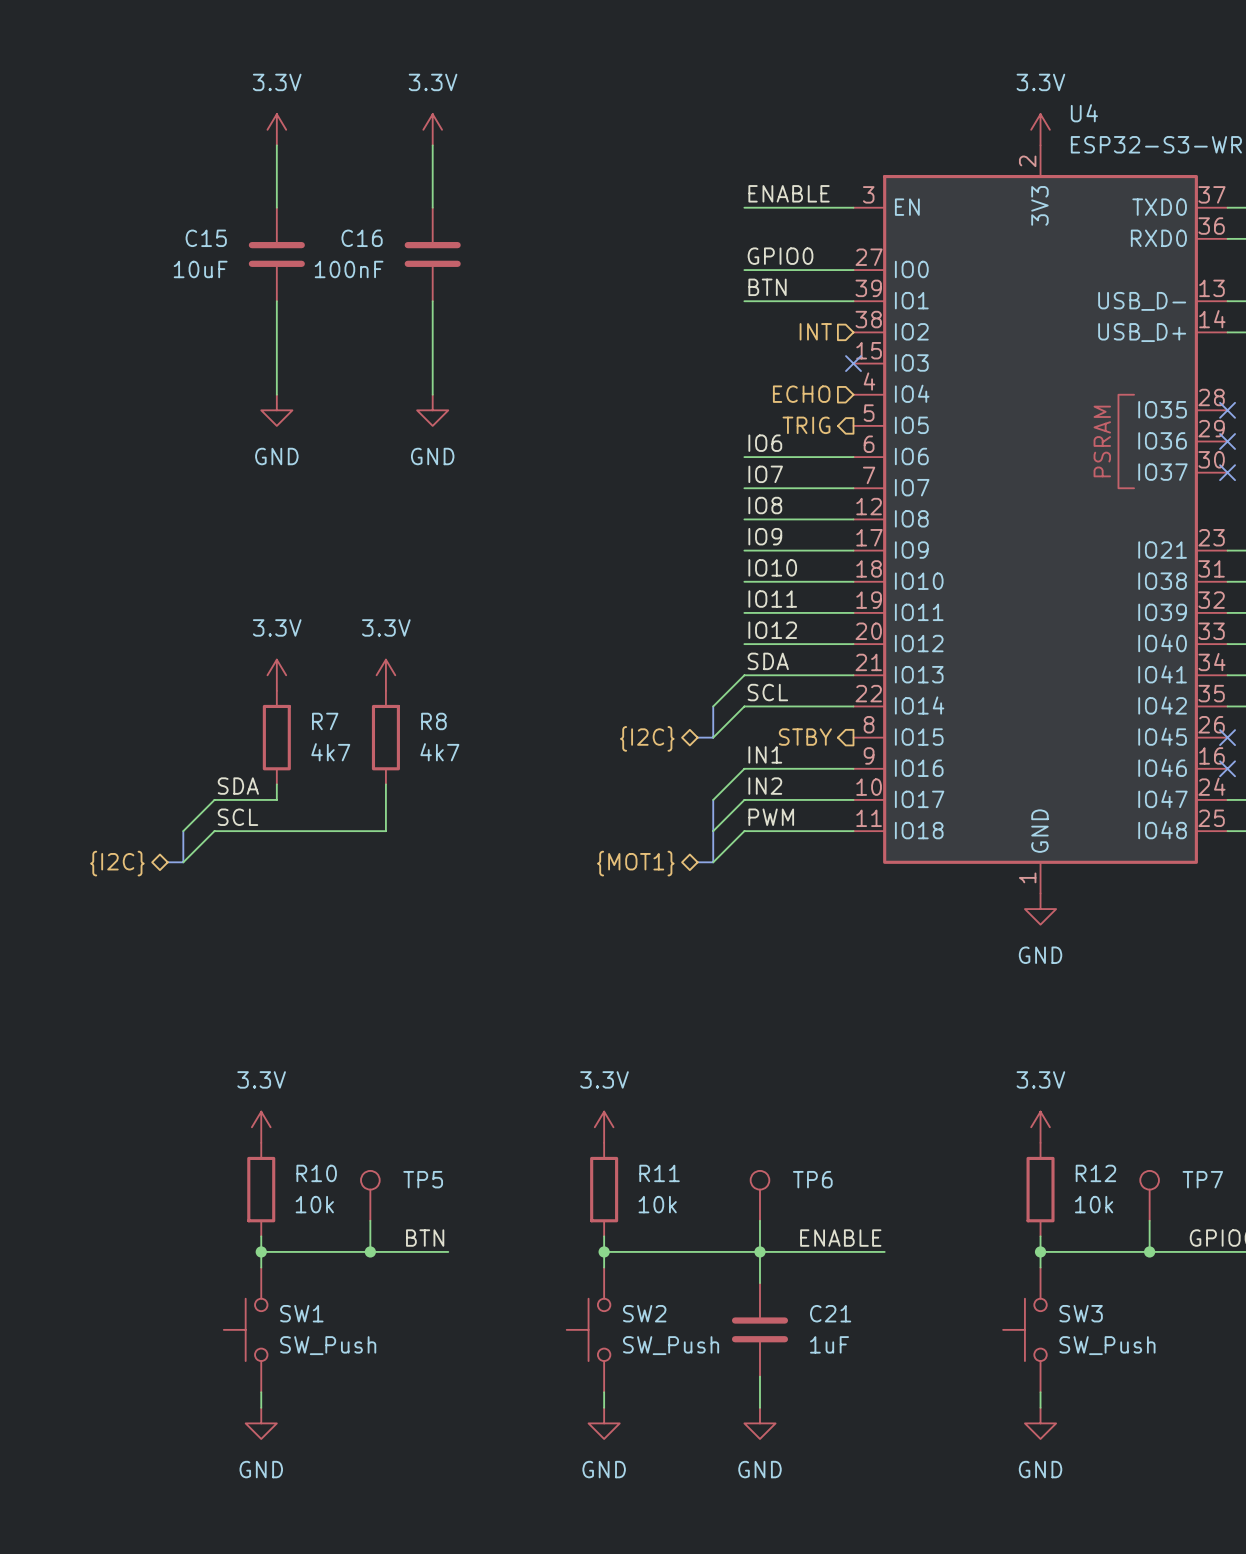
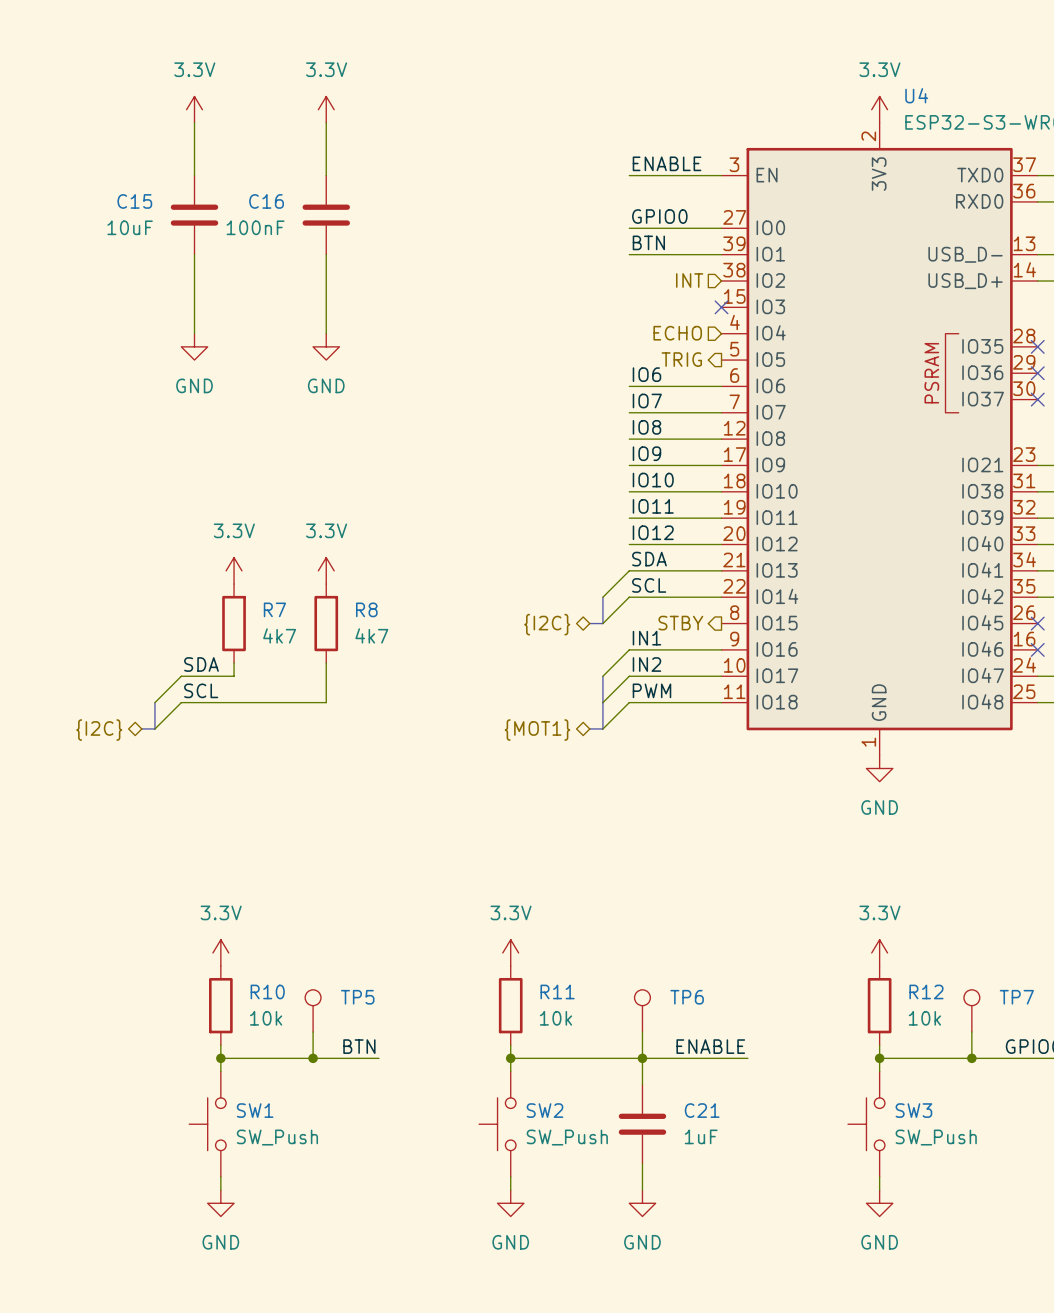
power symbol position: 3.3V (276, 129) -> 3.3V (194, 109)
power symbol position: 3.3V (432, 129) -> 3.3V (326, 109)
wire: (276, 145) (276, 207) -> (194, 122) (194, 175)
wire: (432, 145) (432, 207) -> (326, 122) (326, 175)
C15 position: (276, 254) -> (194, 215)
C16 position: (432, 254) -> (326, 215)
wire: (276, 301) (276, 394) -> (194, 254) (194, 333)
wire: (432, 301) (432, 394) -> (326, 254) (326, 333)
power symbol position: GND (276, 410) -> GND (194, 346)
power symbol position: GND (432, 410) -> GND (326, 346)

